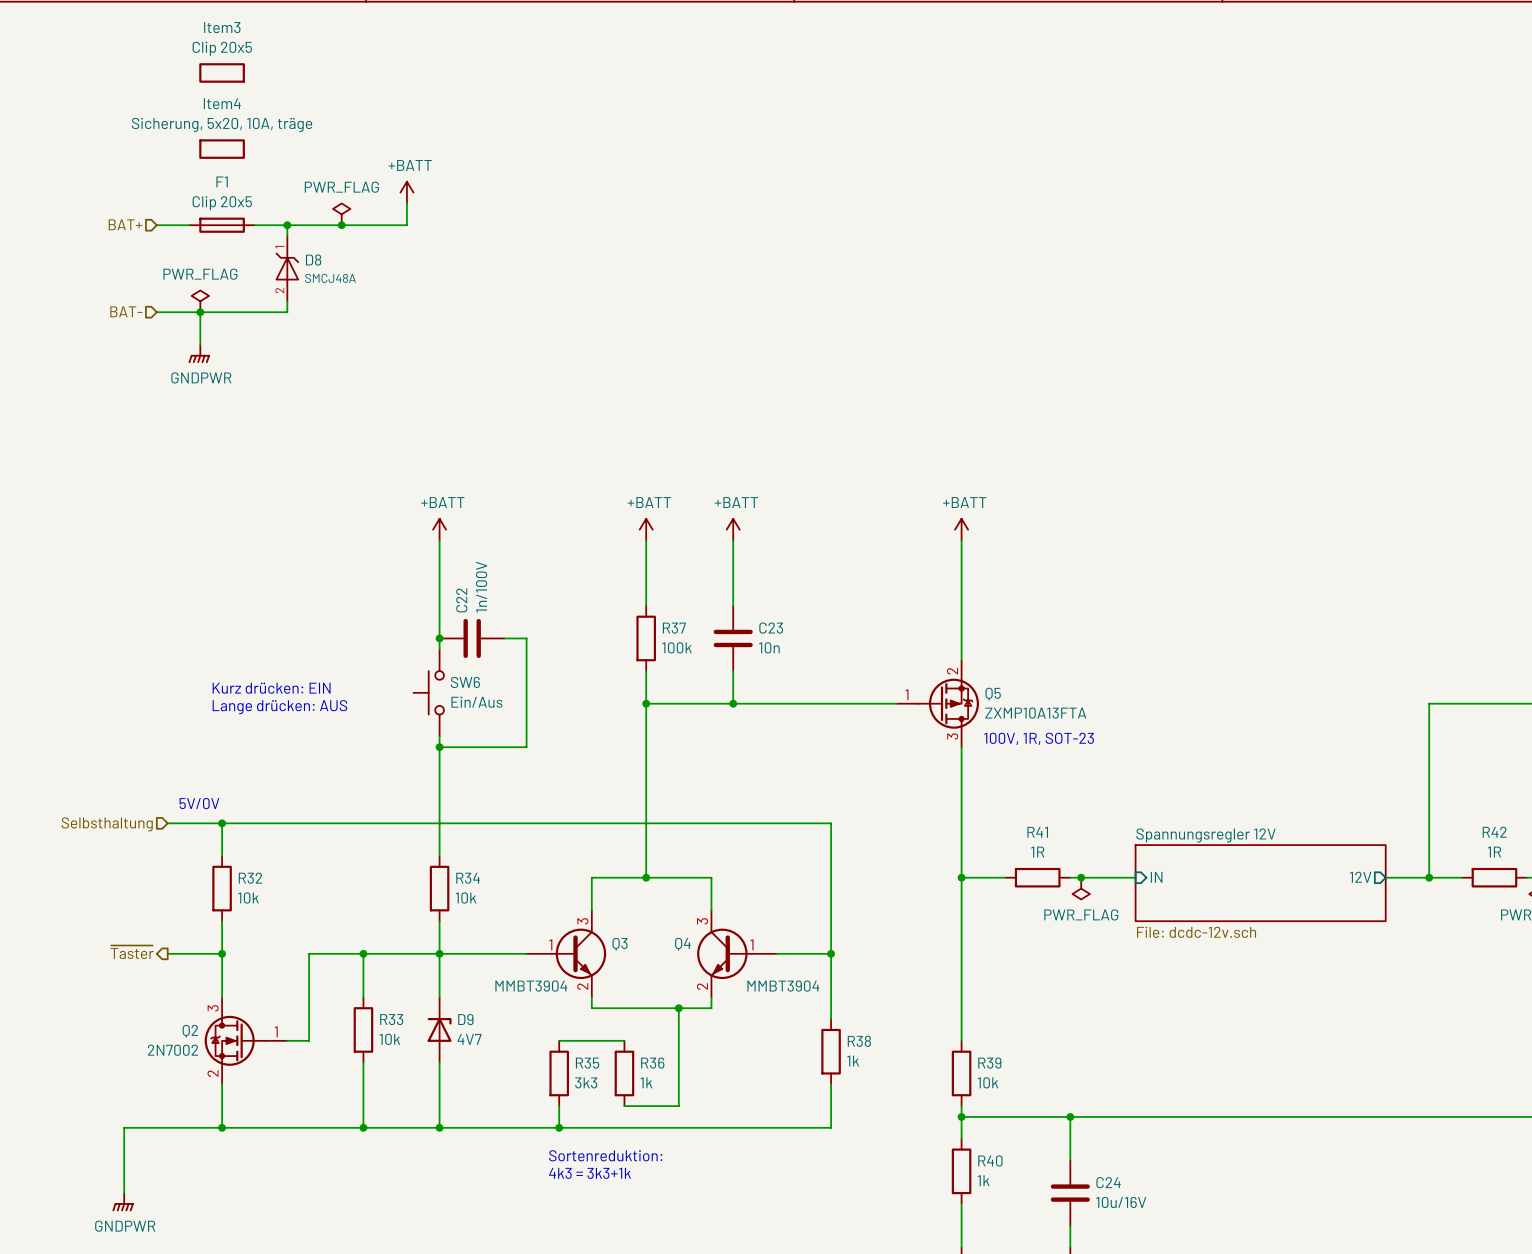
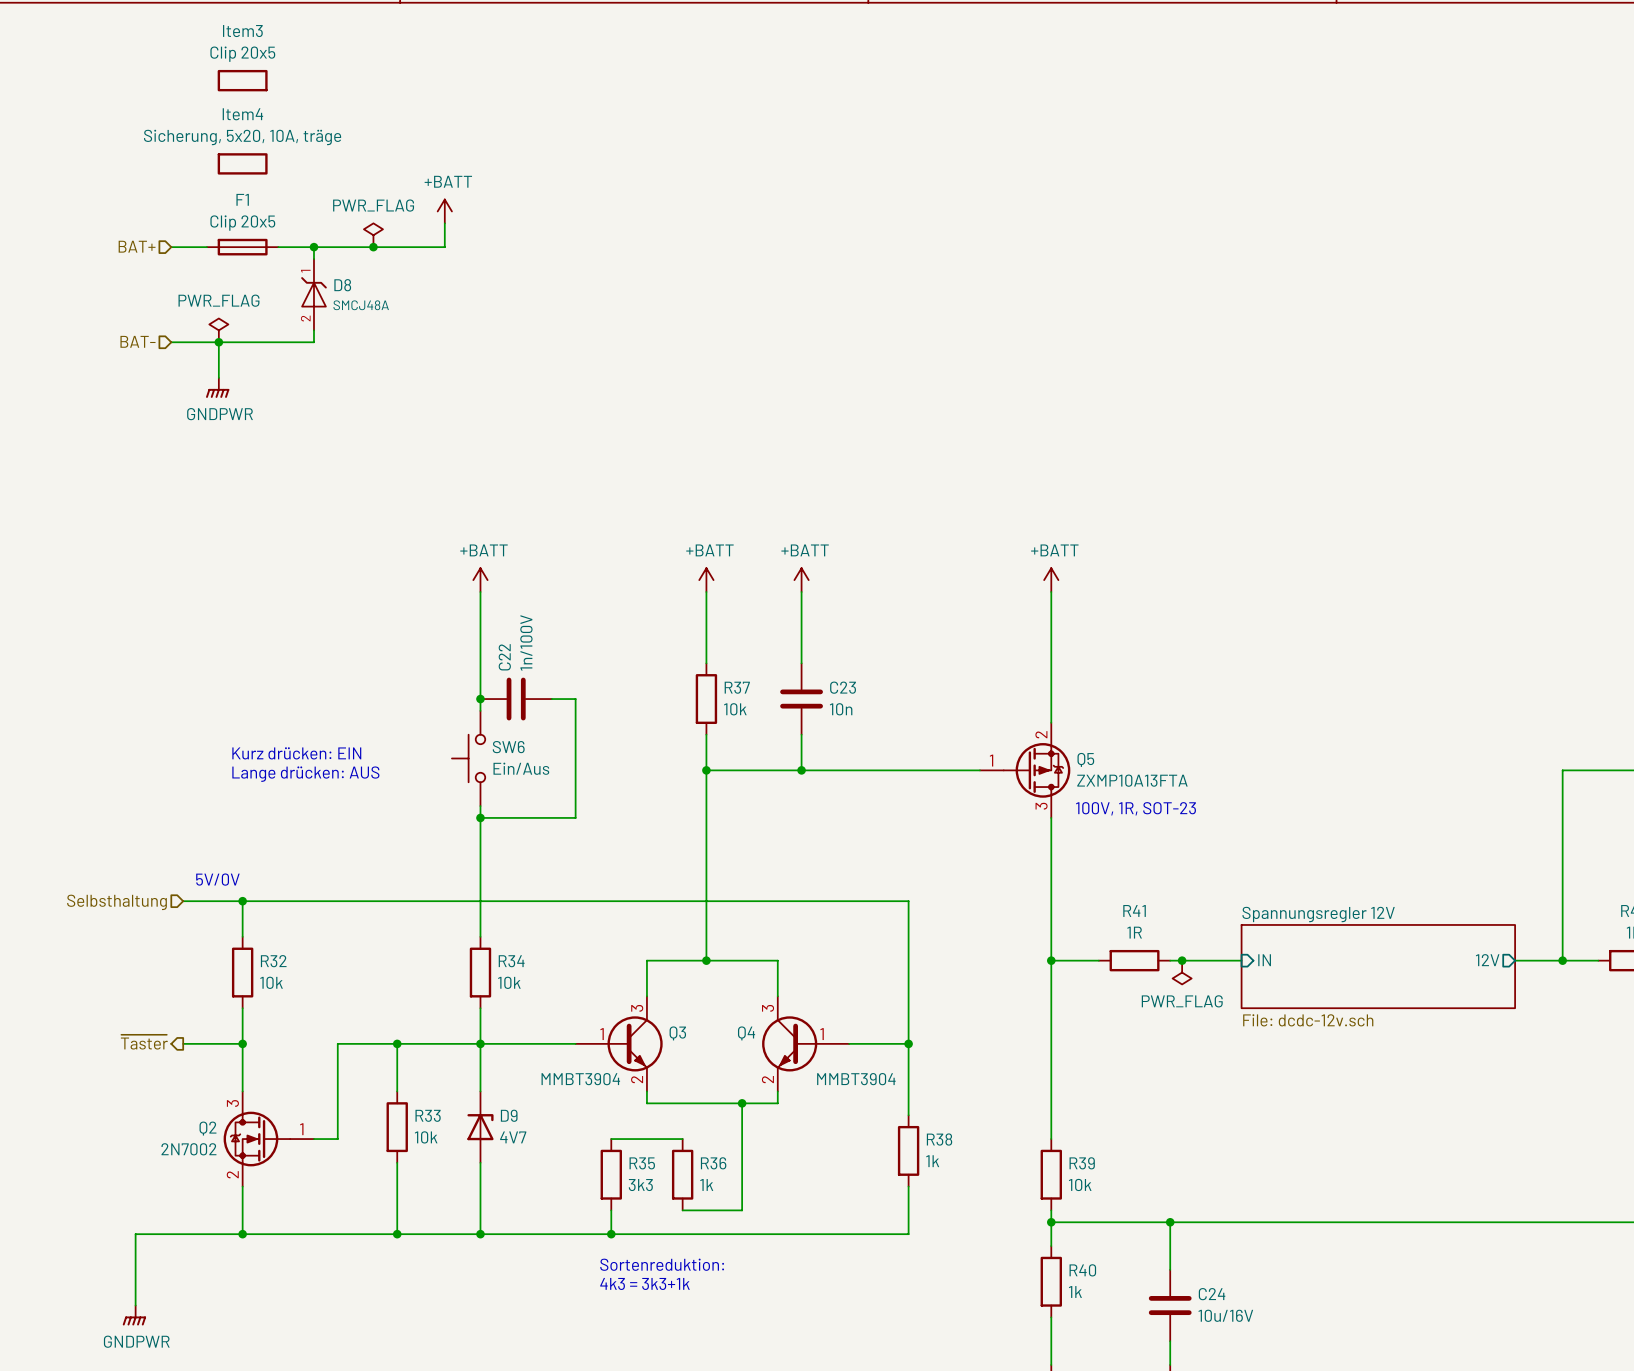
R37 value: 100k (677, 647) -> 10k (735, 709)

